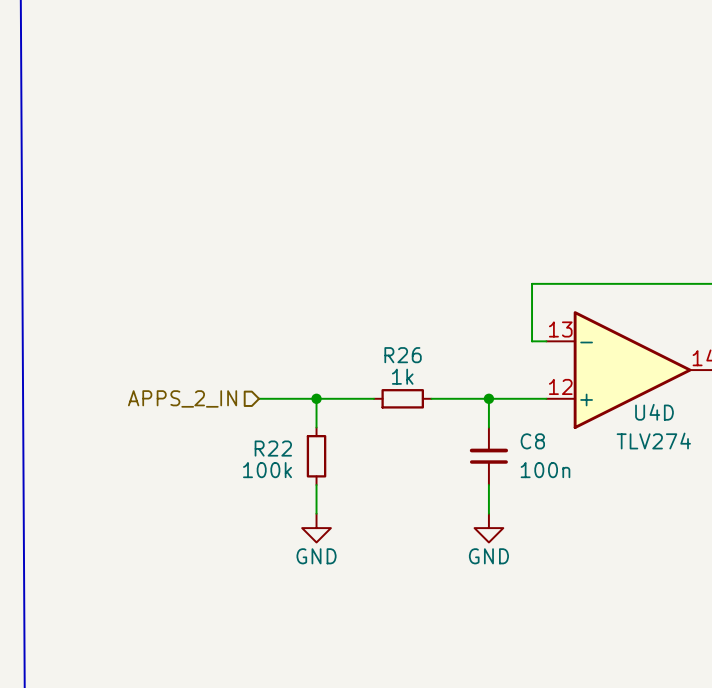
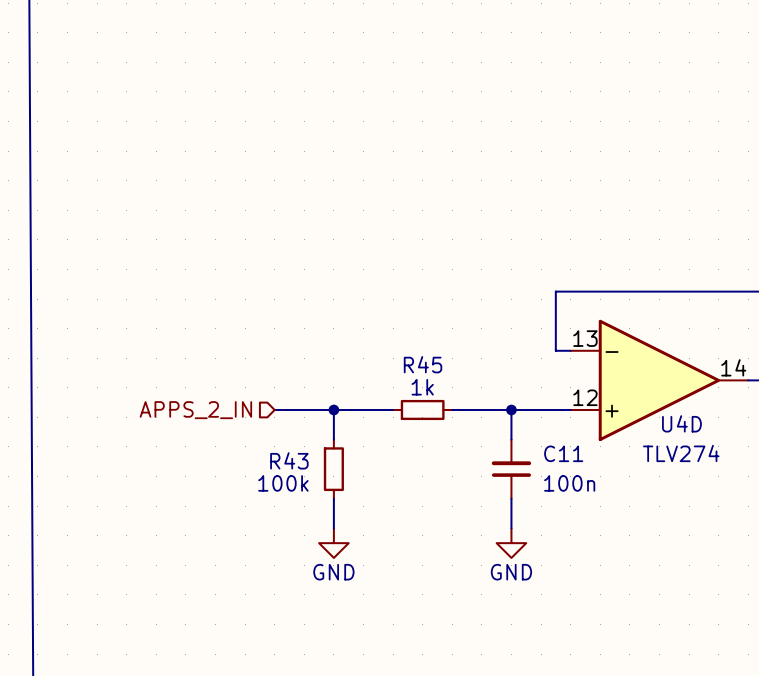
R26 name: R26 (403, 355) -> R45 (423, 364)
C8 name: C8 (532, 441) -> C11 (563, 453)
R22 name: R22 (273, 448) -> R43 (289, 460)

